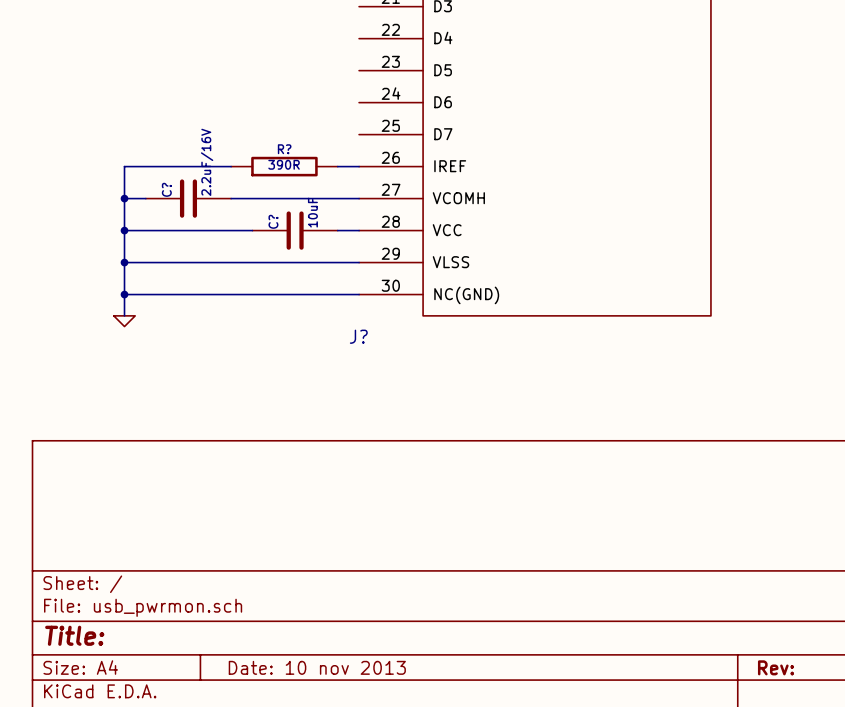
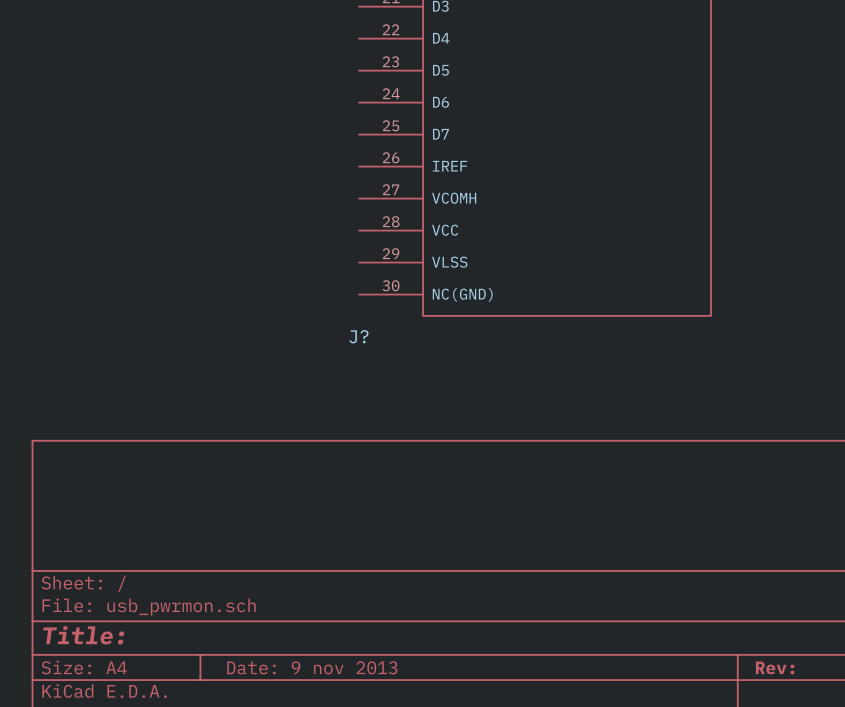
wire: (231, 166) (124, 166) (124, 315) -> none
R?: 390R (284, 166) -> none
wire: (337, 166) (359, 166) -> none
wire: (124, 198) (145, 198) -> none
junction: (124, 198) -> none
C?: 2.2uF/16V (188, 198) -> none
wire: (231, 198) (359, 198) -> none
wire: (124, 230) (252, 230) -> none
junction: (124, 230) -> none
C?: 10uF (295, 230) -> none
wire: (337, 230) (359, 230) -> none
wire: (124, 262) (359, 262) -> none
junction: (124, 262) -> none
wire: (124, 294) (359, 294) -> none
junction: (124, 294) -> none
power symbol: (124, 321) -> none
title block: Date: 10 nov 2013 (317, 667) -> Date: 9 nov 2013 (312, 667)

